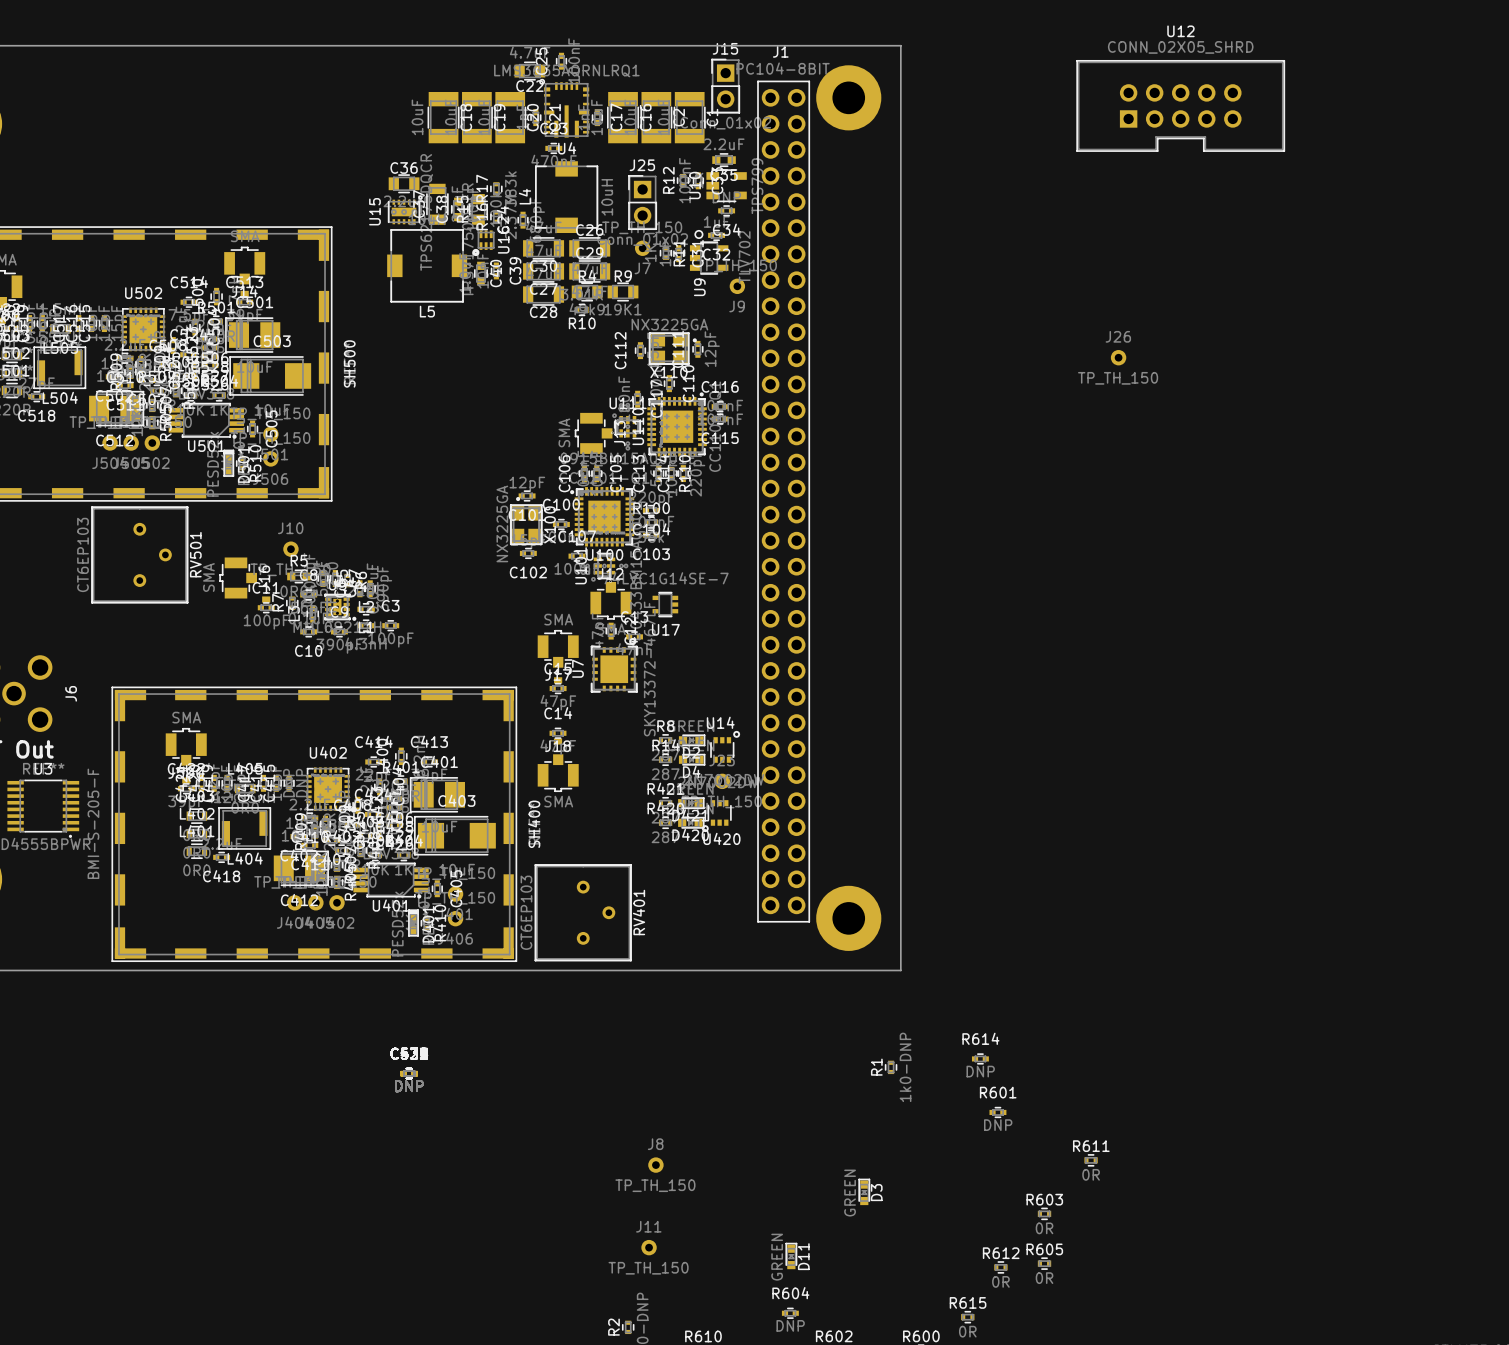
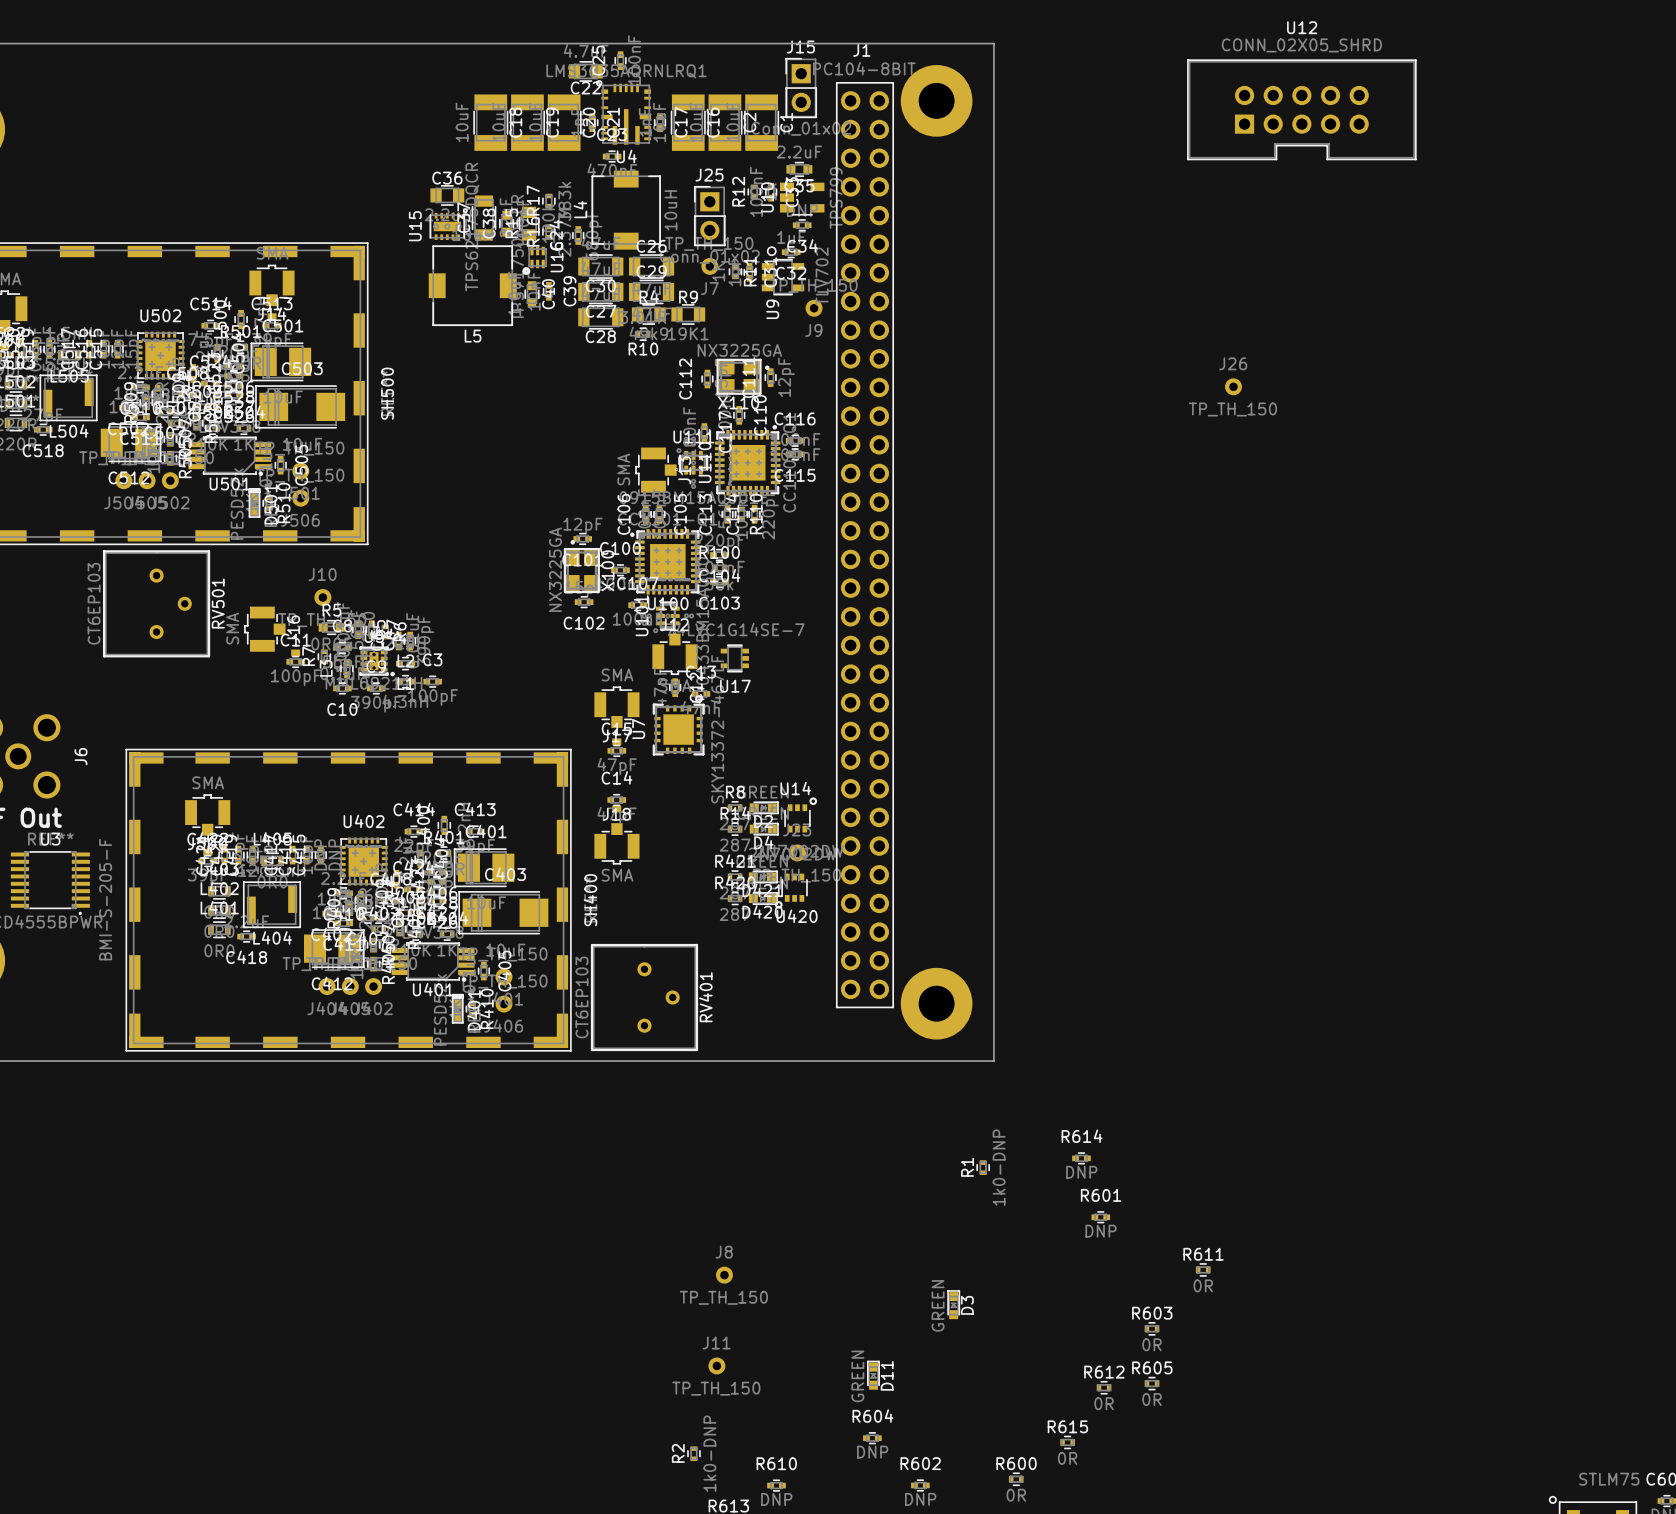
part: DNP (409, 1073) -> none
part: DNP (409, 1073) -> none
part: DNP (409, 1073) -> none
part: DNP (409, 1073) -> none
part: DNP (409, 1073) -> none
part: DNP (409, 1073) -> none
part: DNP (409, 1073) -> none
part: DNP (409, 1073) -> none
part: DNP (409, 1073) -> none
part: DNP (409, 1073) -> none
part: DNP (409, 1073) -> none
part: DNP (409, 1073) -> none

